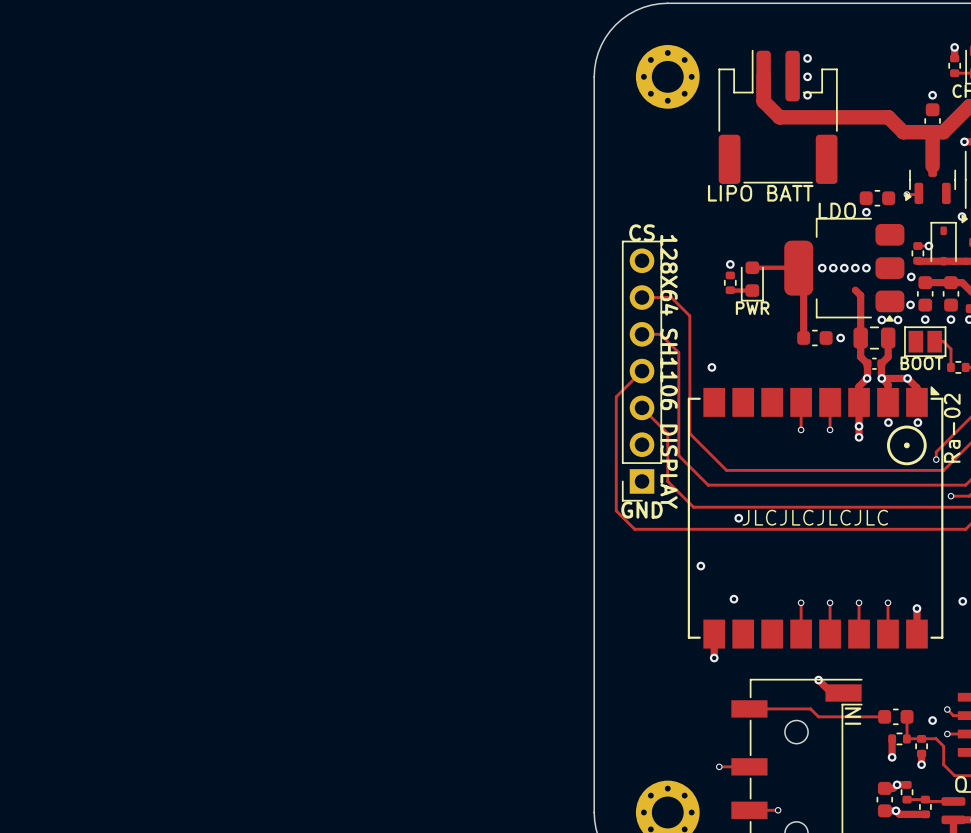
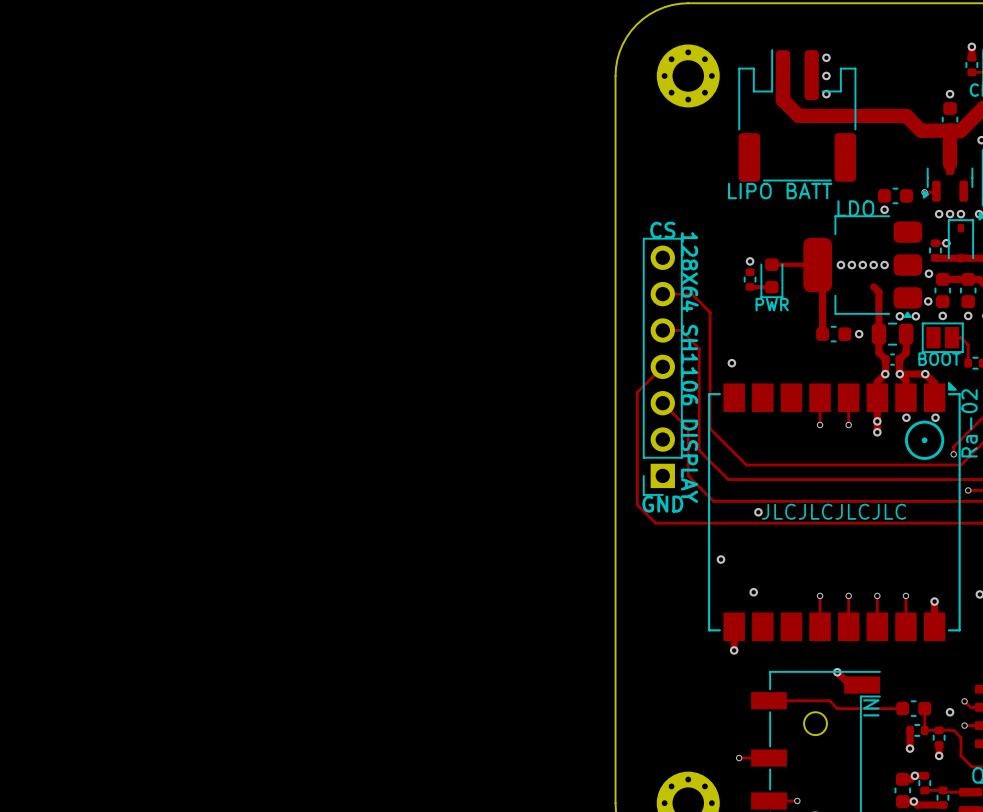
via: none -> (939, 214)
via: none -> (950, 214)
via: none -> (960, 214)

